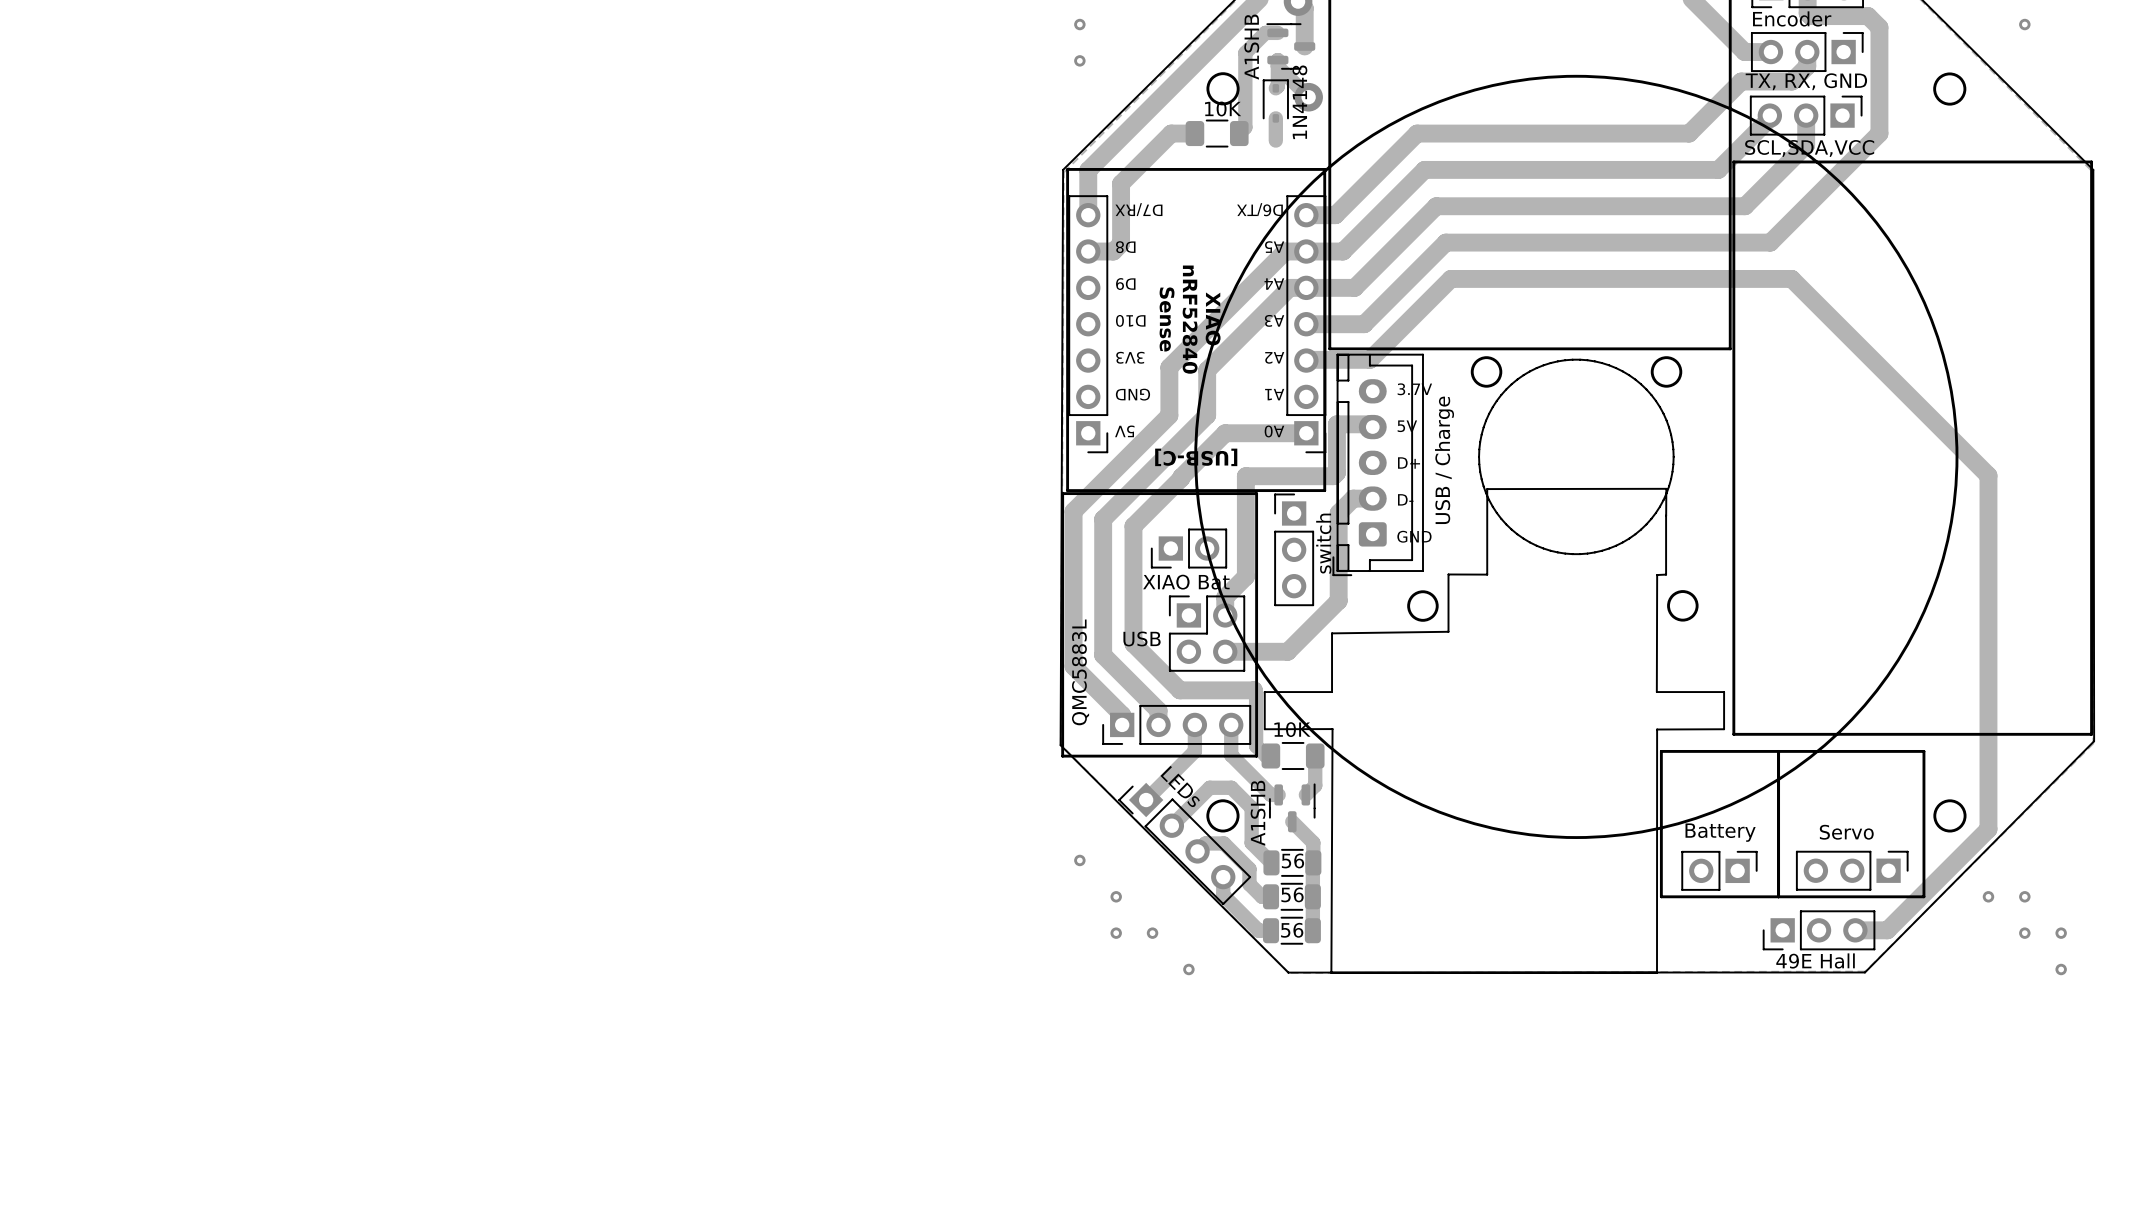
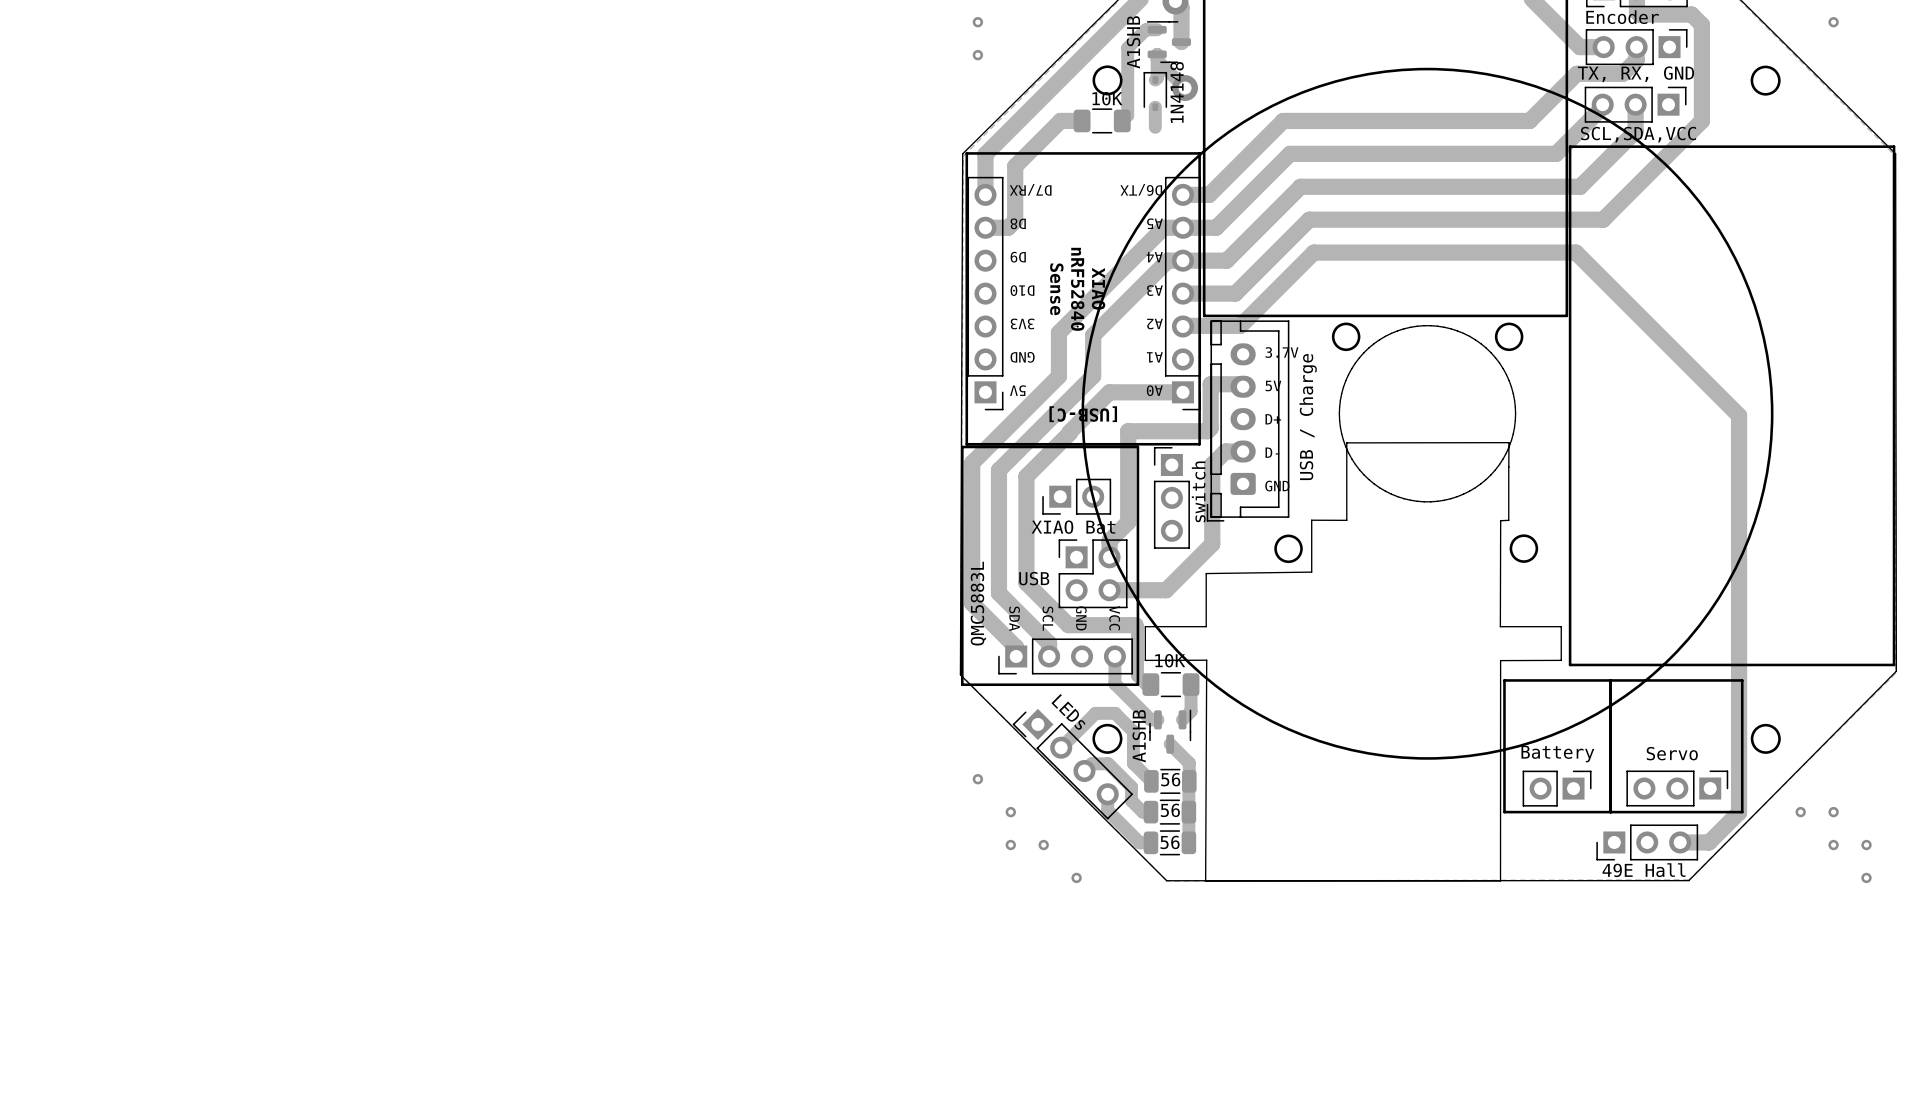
track: (1740, 278) (1791, 278) (1988, 475) (1988, 829) (1920, 897) -> (1576, 252) (1739, 415) (1739, 812)
text: none -> GND (1081, 618)
text: none -> VCC (1114, 618)
text: none -> SDA (1014, 618)
text: none -> SCL (1047, 618)
track: (1194, 724) (1194, 751) (1146, 800) -> none

